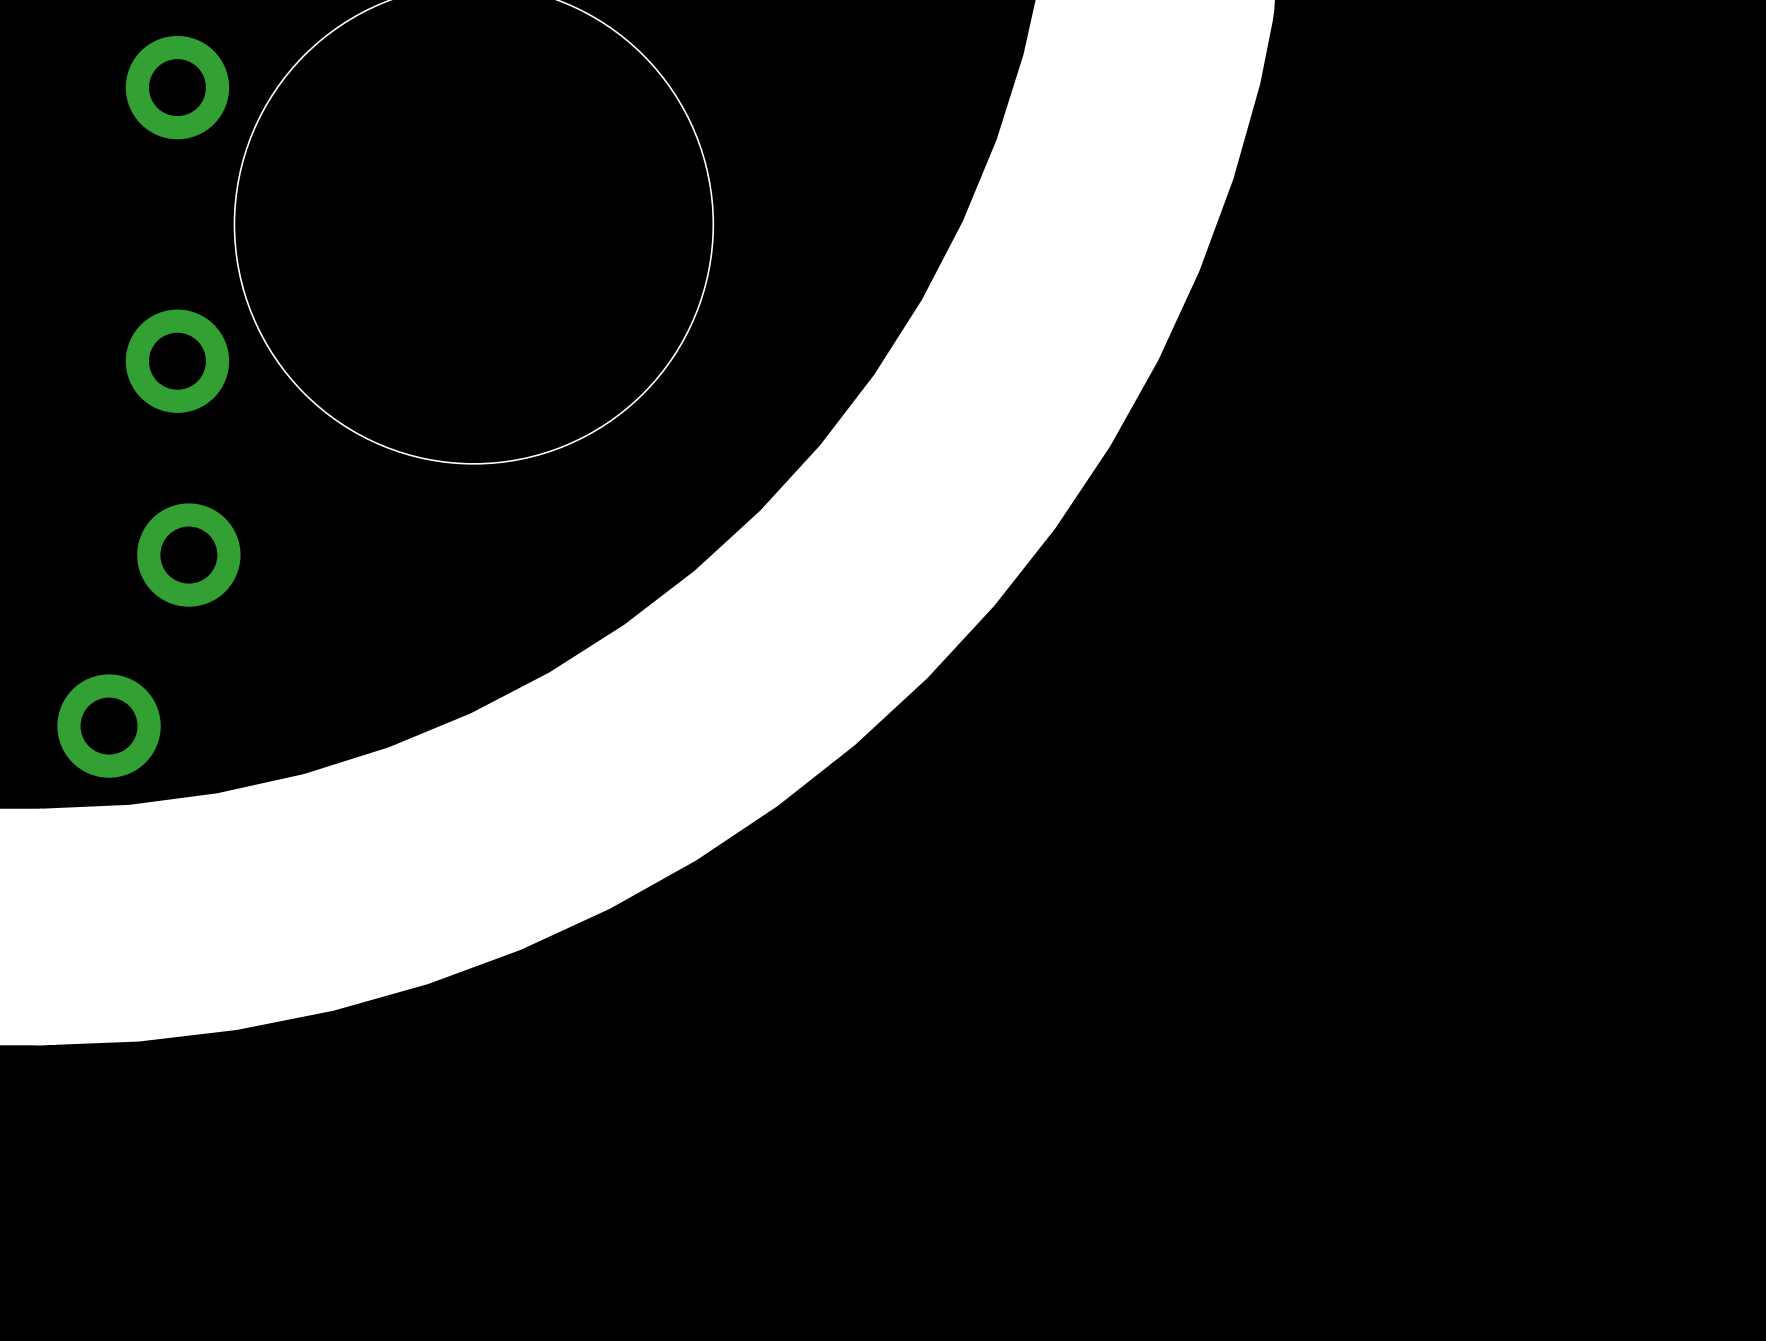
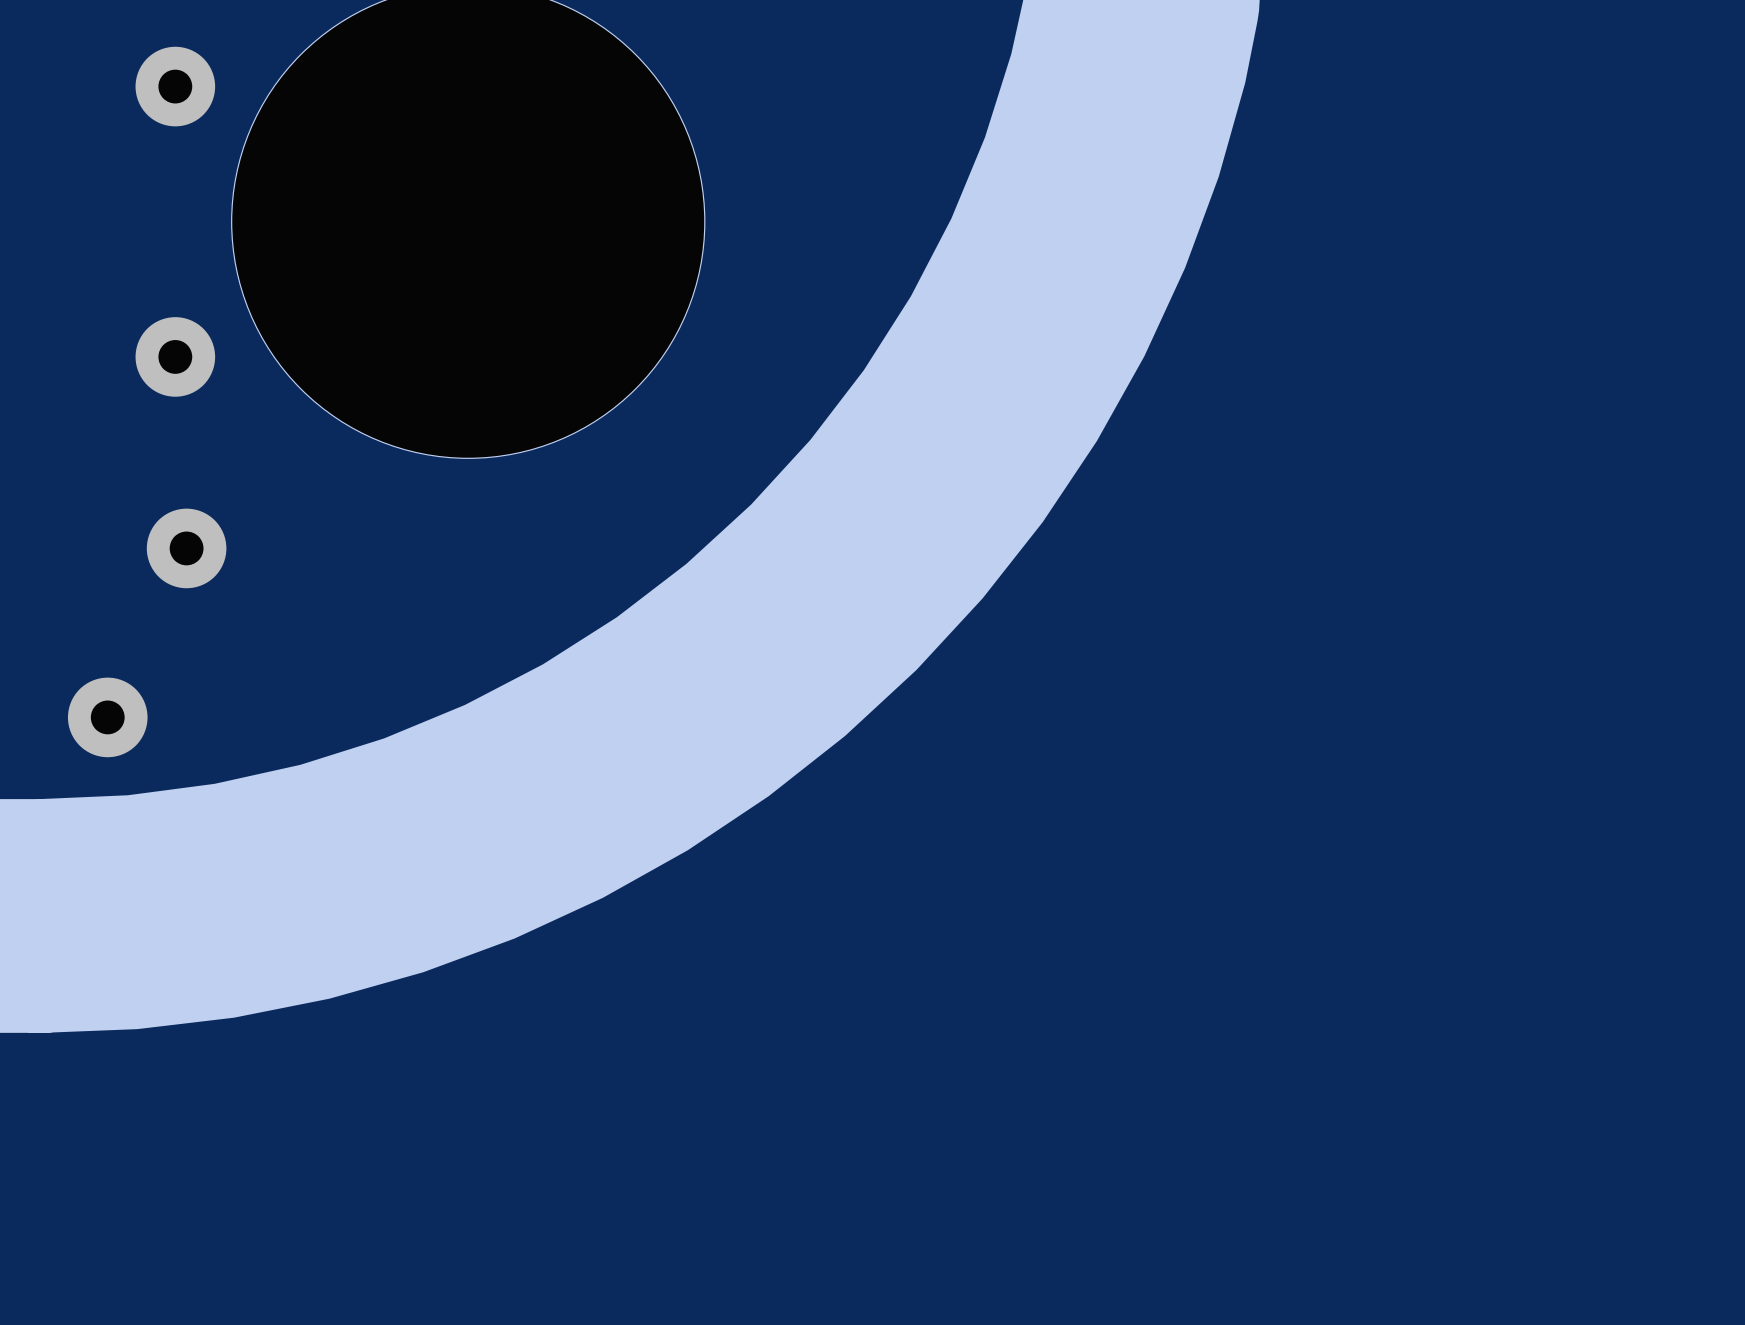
via size: [125, 35, 230, 140] -> [135, 46, 216, 127]
via size: [125, 309, 230, 413] -> [135, 317, 216, 397]
via size: [137, 503, 241, 607] -> [146, 508, 227, 589]
via size: [57, 674, 161, 778] -> [67, 677, 148, 758]

